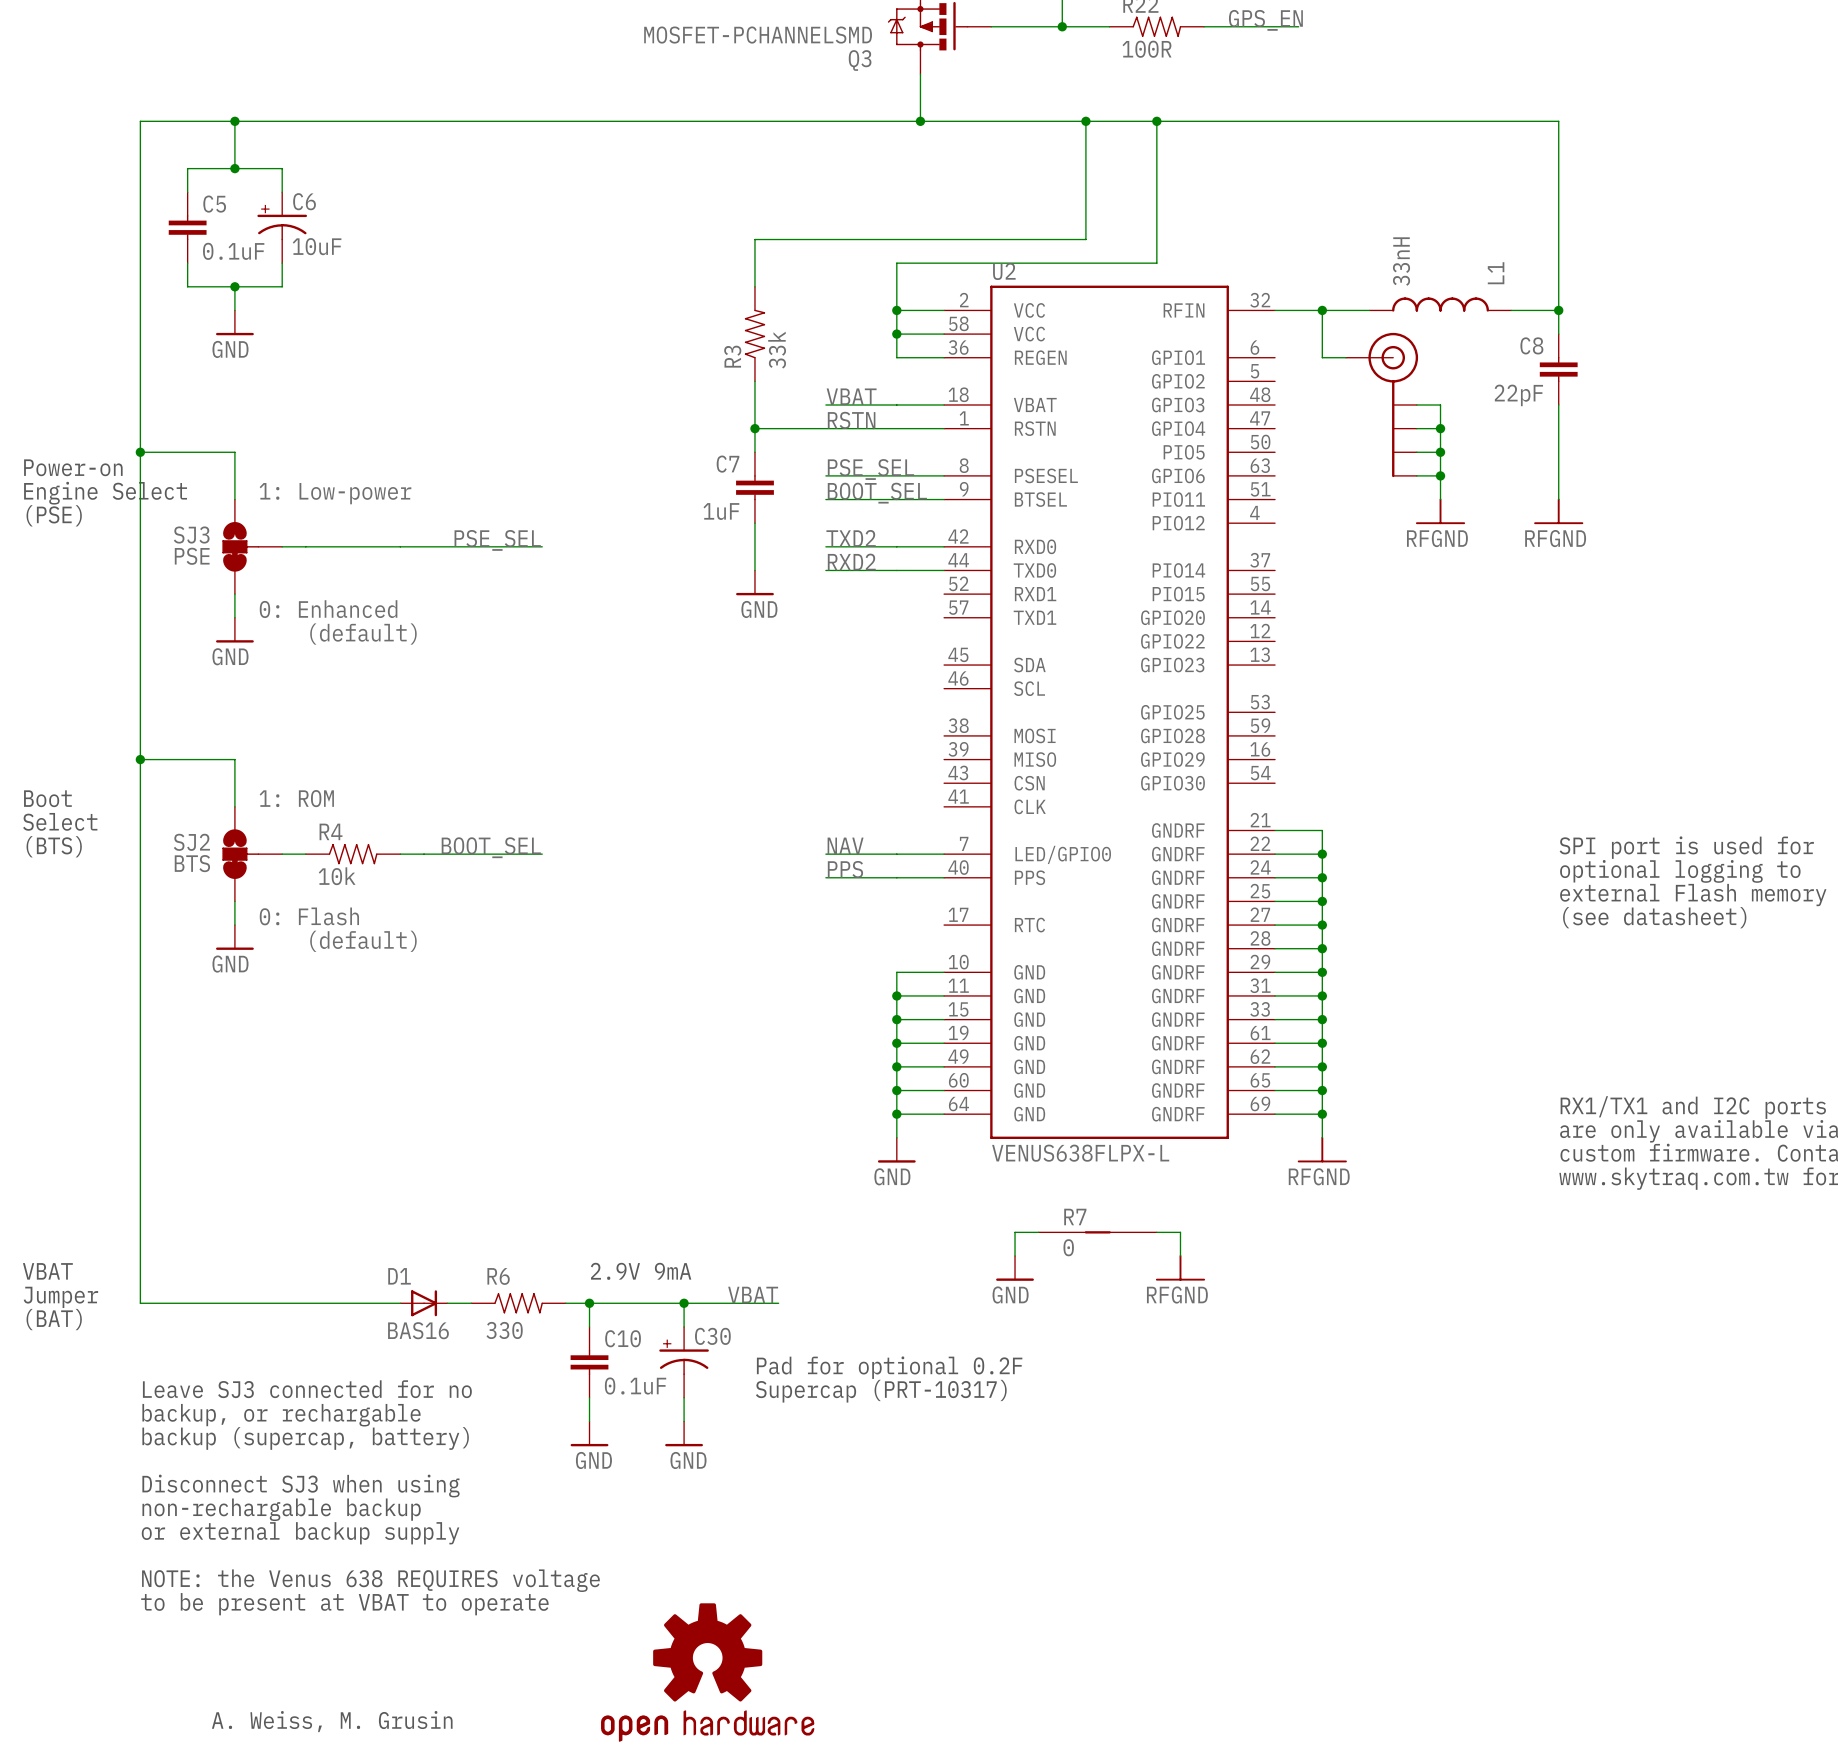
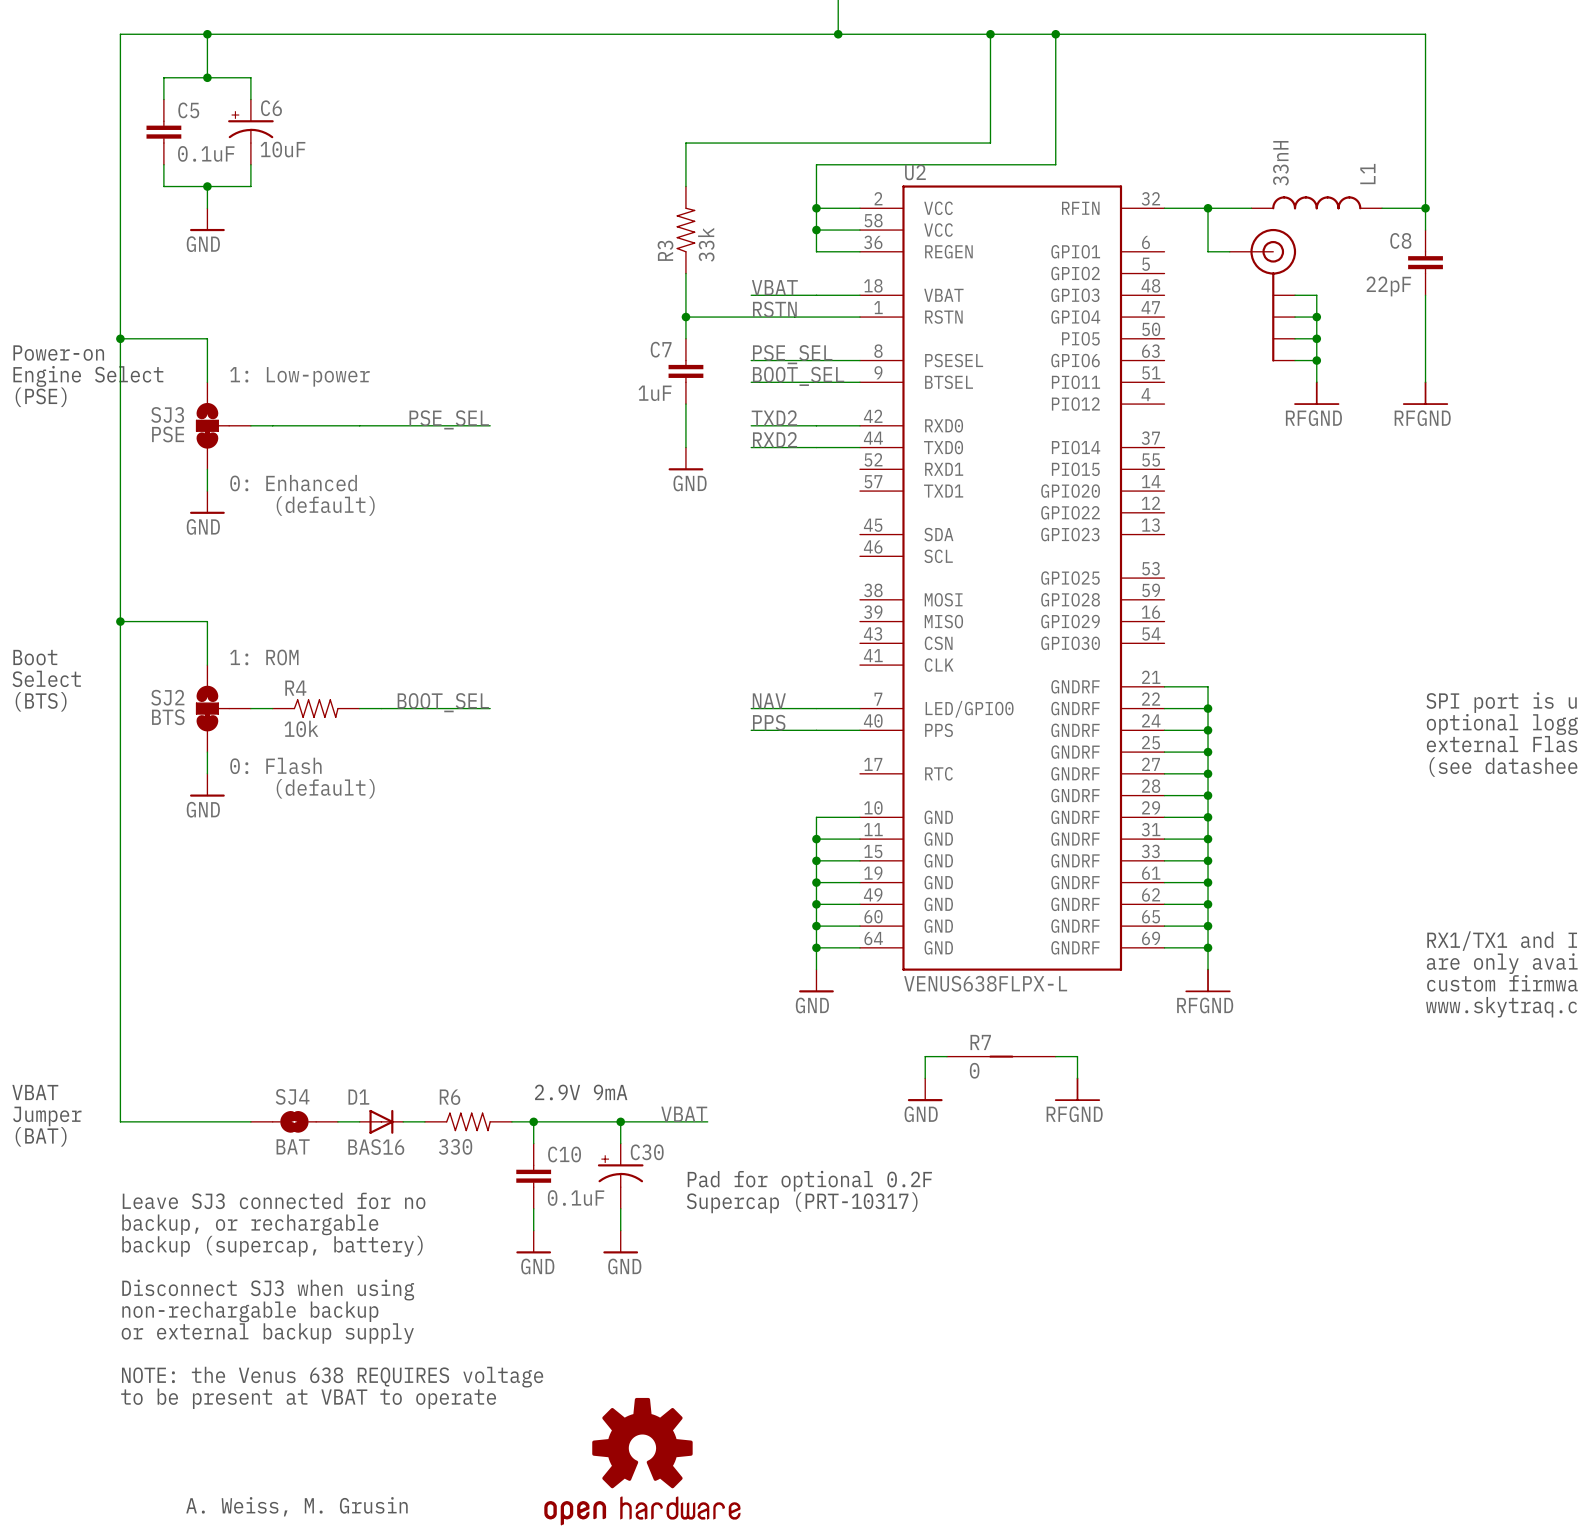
SJ4: none -> BAT (294, 1121)

